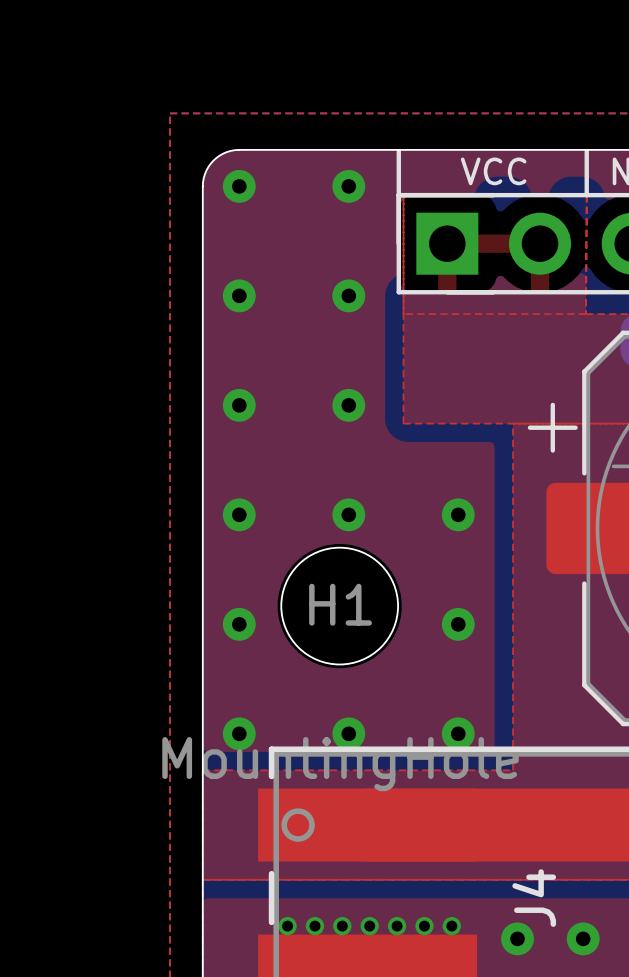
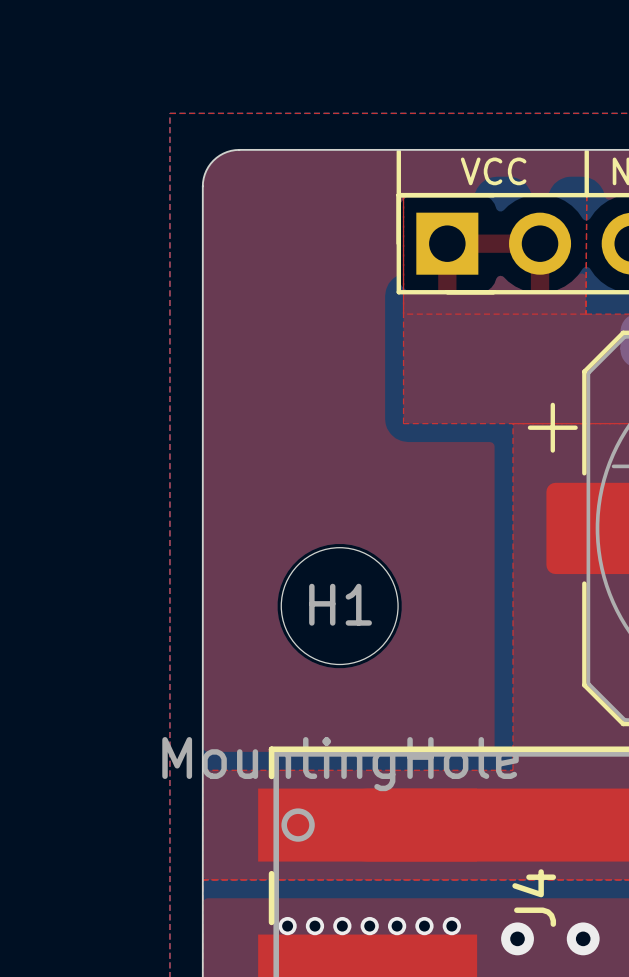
via: (239, 186) -> none
via: (348, 186) -> none
via: (239, 295) -> none
via: (348, 295) -> none
via: (239, 405) -> none
via: (348, 405) -> none
via: (239, 514) -> none
via: (348, 514) -> none
via: (458, 514) -> none
via: (239, 624) -> none
via: (458, 624) -> none
via: (239, 733) -> none
via: (348, 733) -> none
via: (458, 733) -> none

